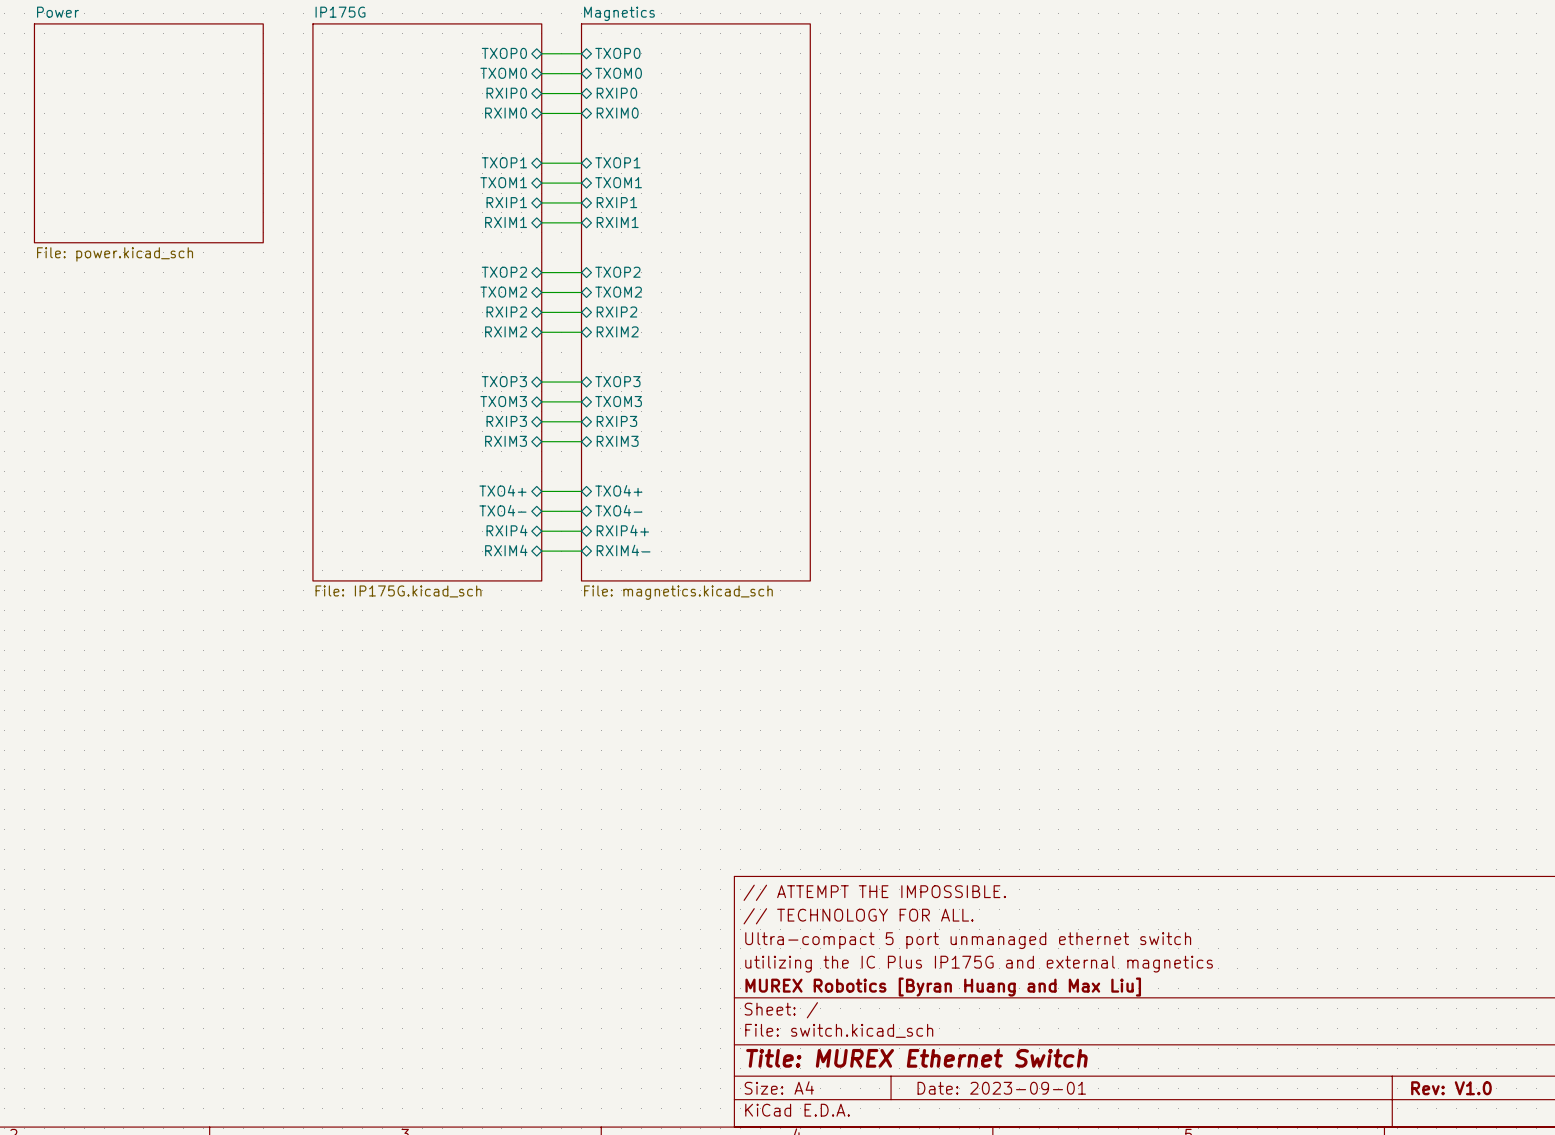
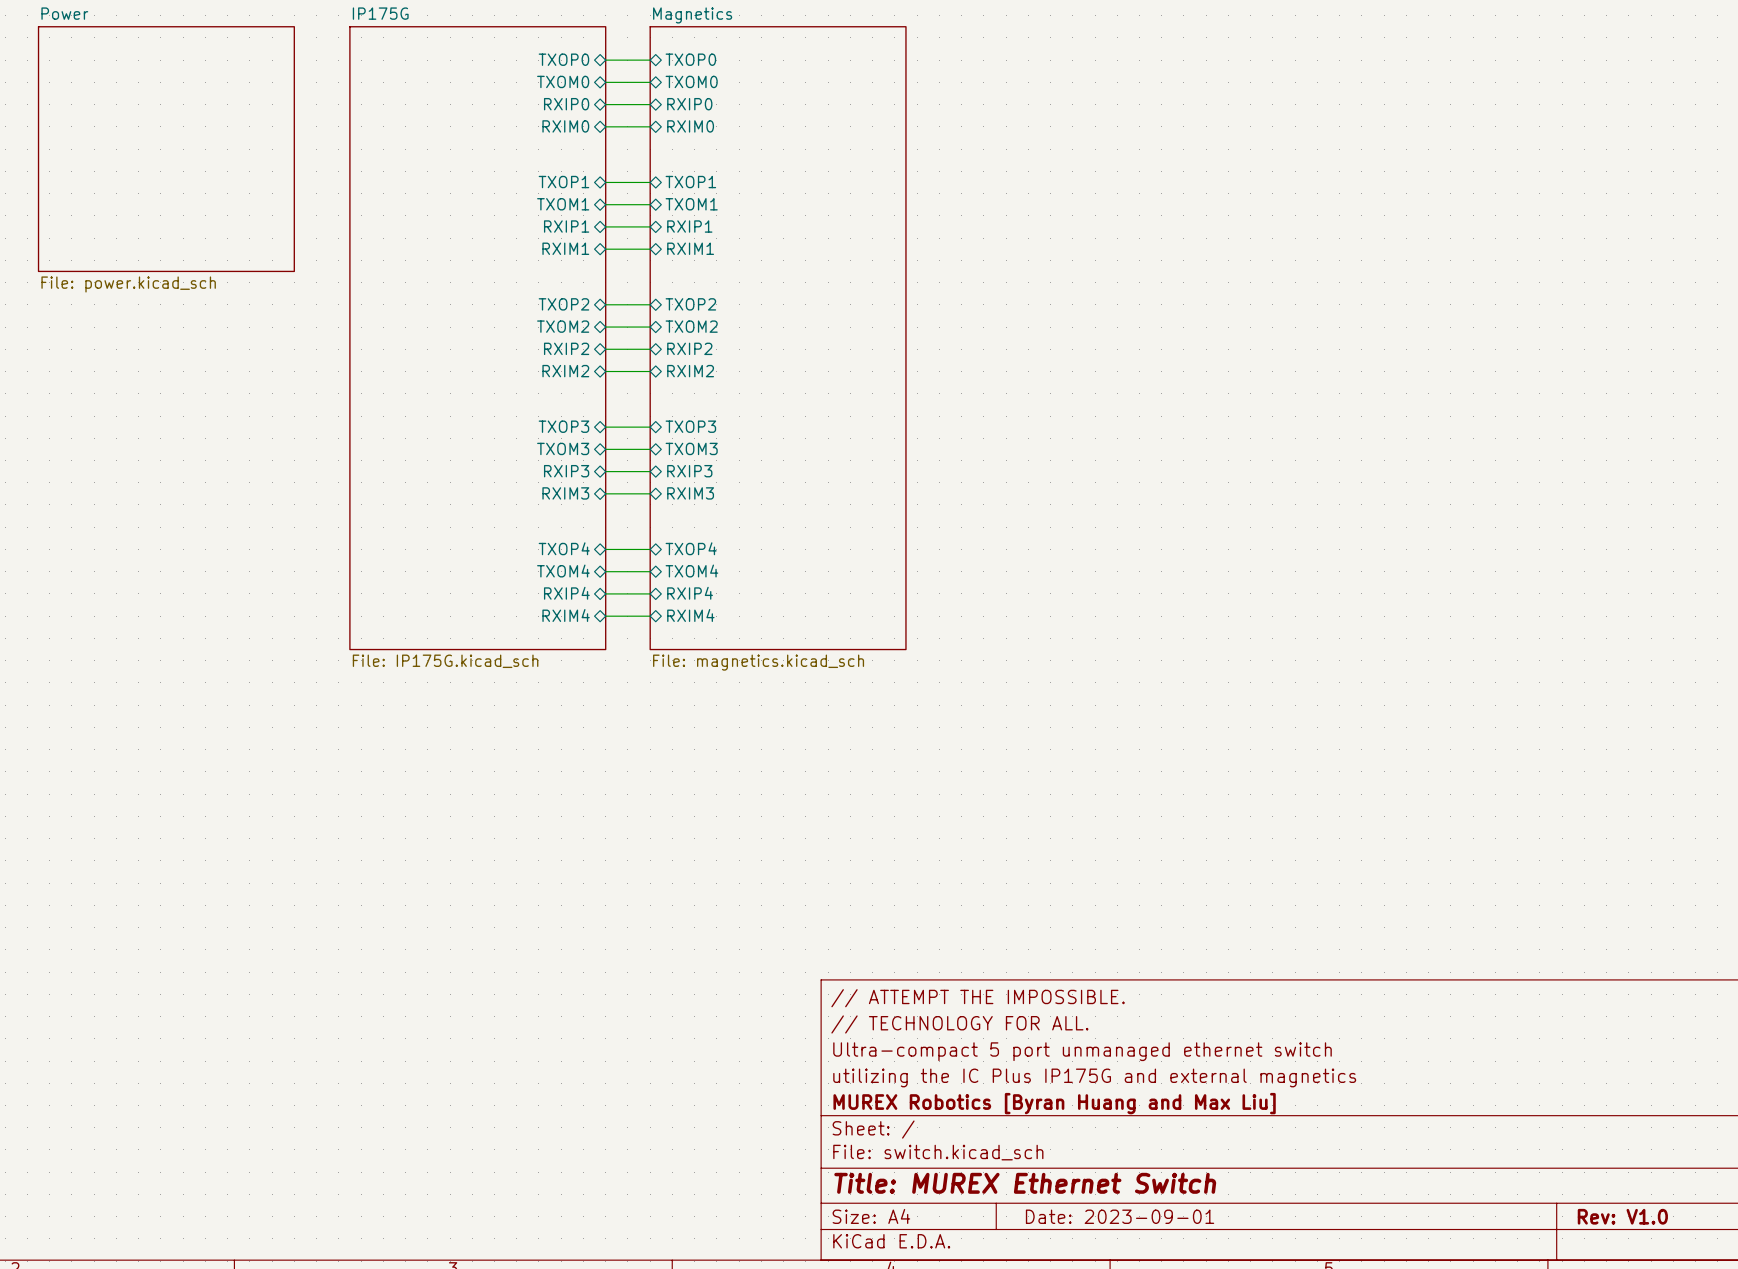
sheet pin: TXO4+ (502, 490) -> TXOP4 (564, 548)
sheet pin: TXO4+ (618, 490) -> TXOP4 (691, 548)
sheet pin: TXO4- (502, 510) -> TXOM4 (563, 571)
sheet pin: TXO4- (618, 510) -> TXOM4 (691, 571)
sheet pin: RXIP4+ (622, 530) -> RXIP4 (690, 593)
sheet pin: RXIM4- (623, 550) -> RXIM4 (690, 615)

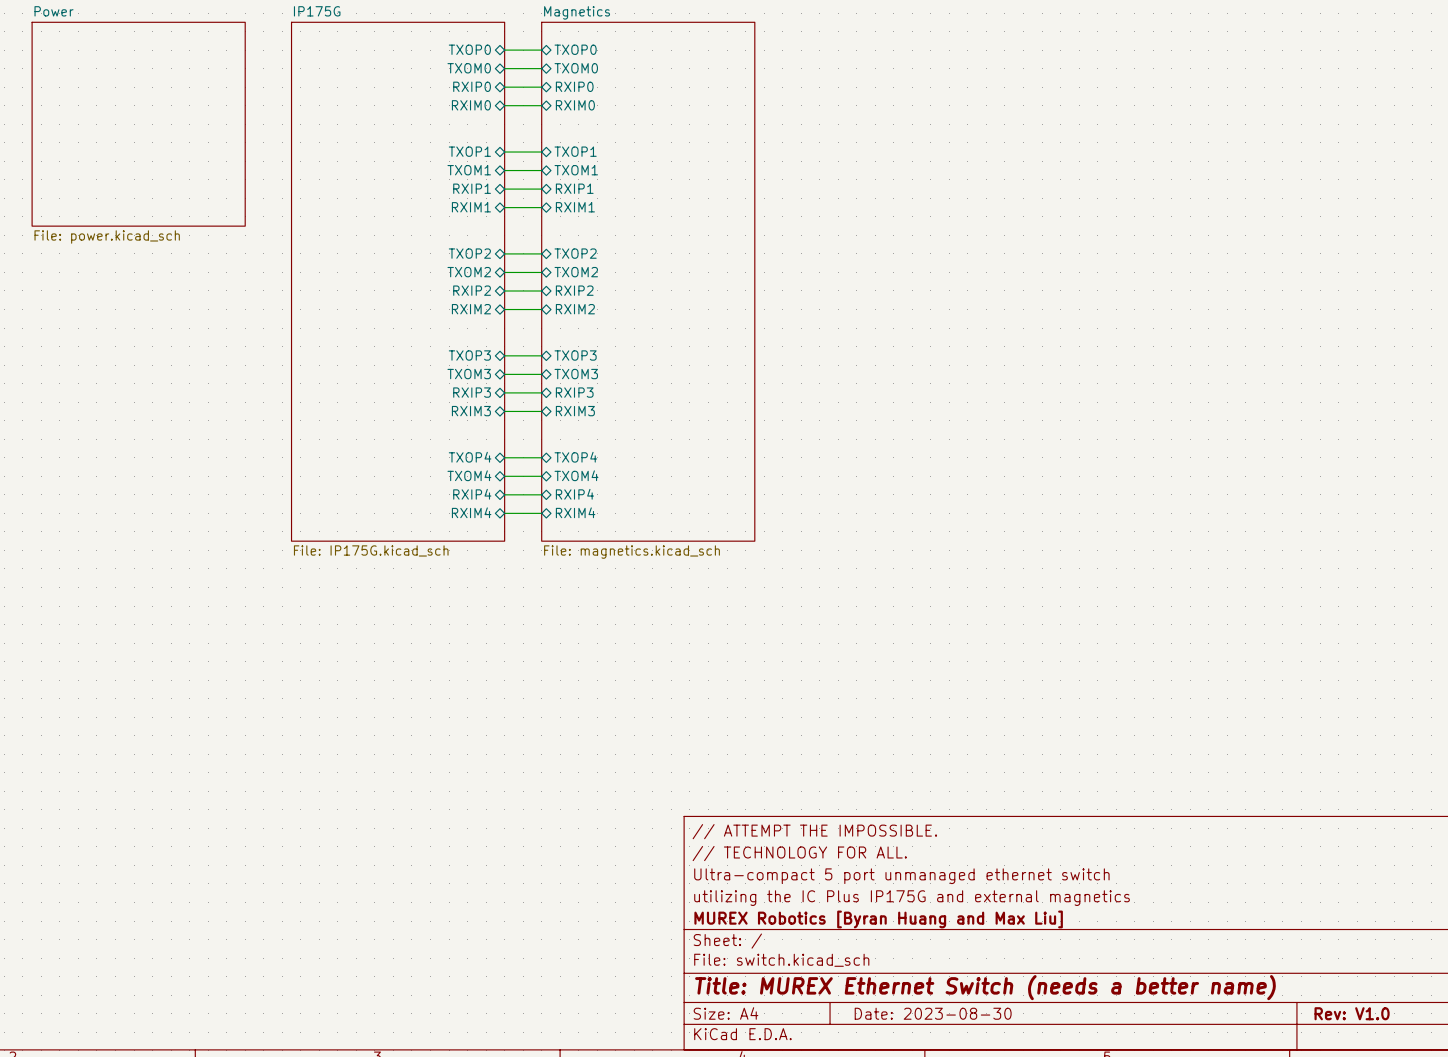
title block: Title: MUREX Ethernet Switch (1025, 1183) -> Title: MUREX Ethernet Switch (needs a better name) (985, 987)
title block: Date: 2023-09-01 (1120, 1216) -> Date: 2023-08-30 (933, 1013)

